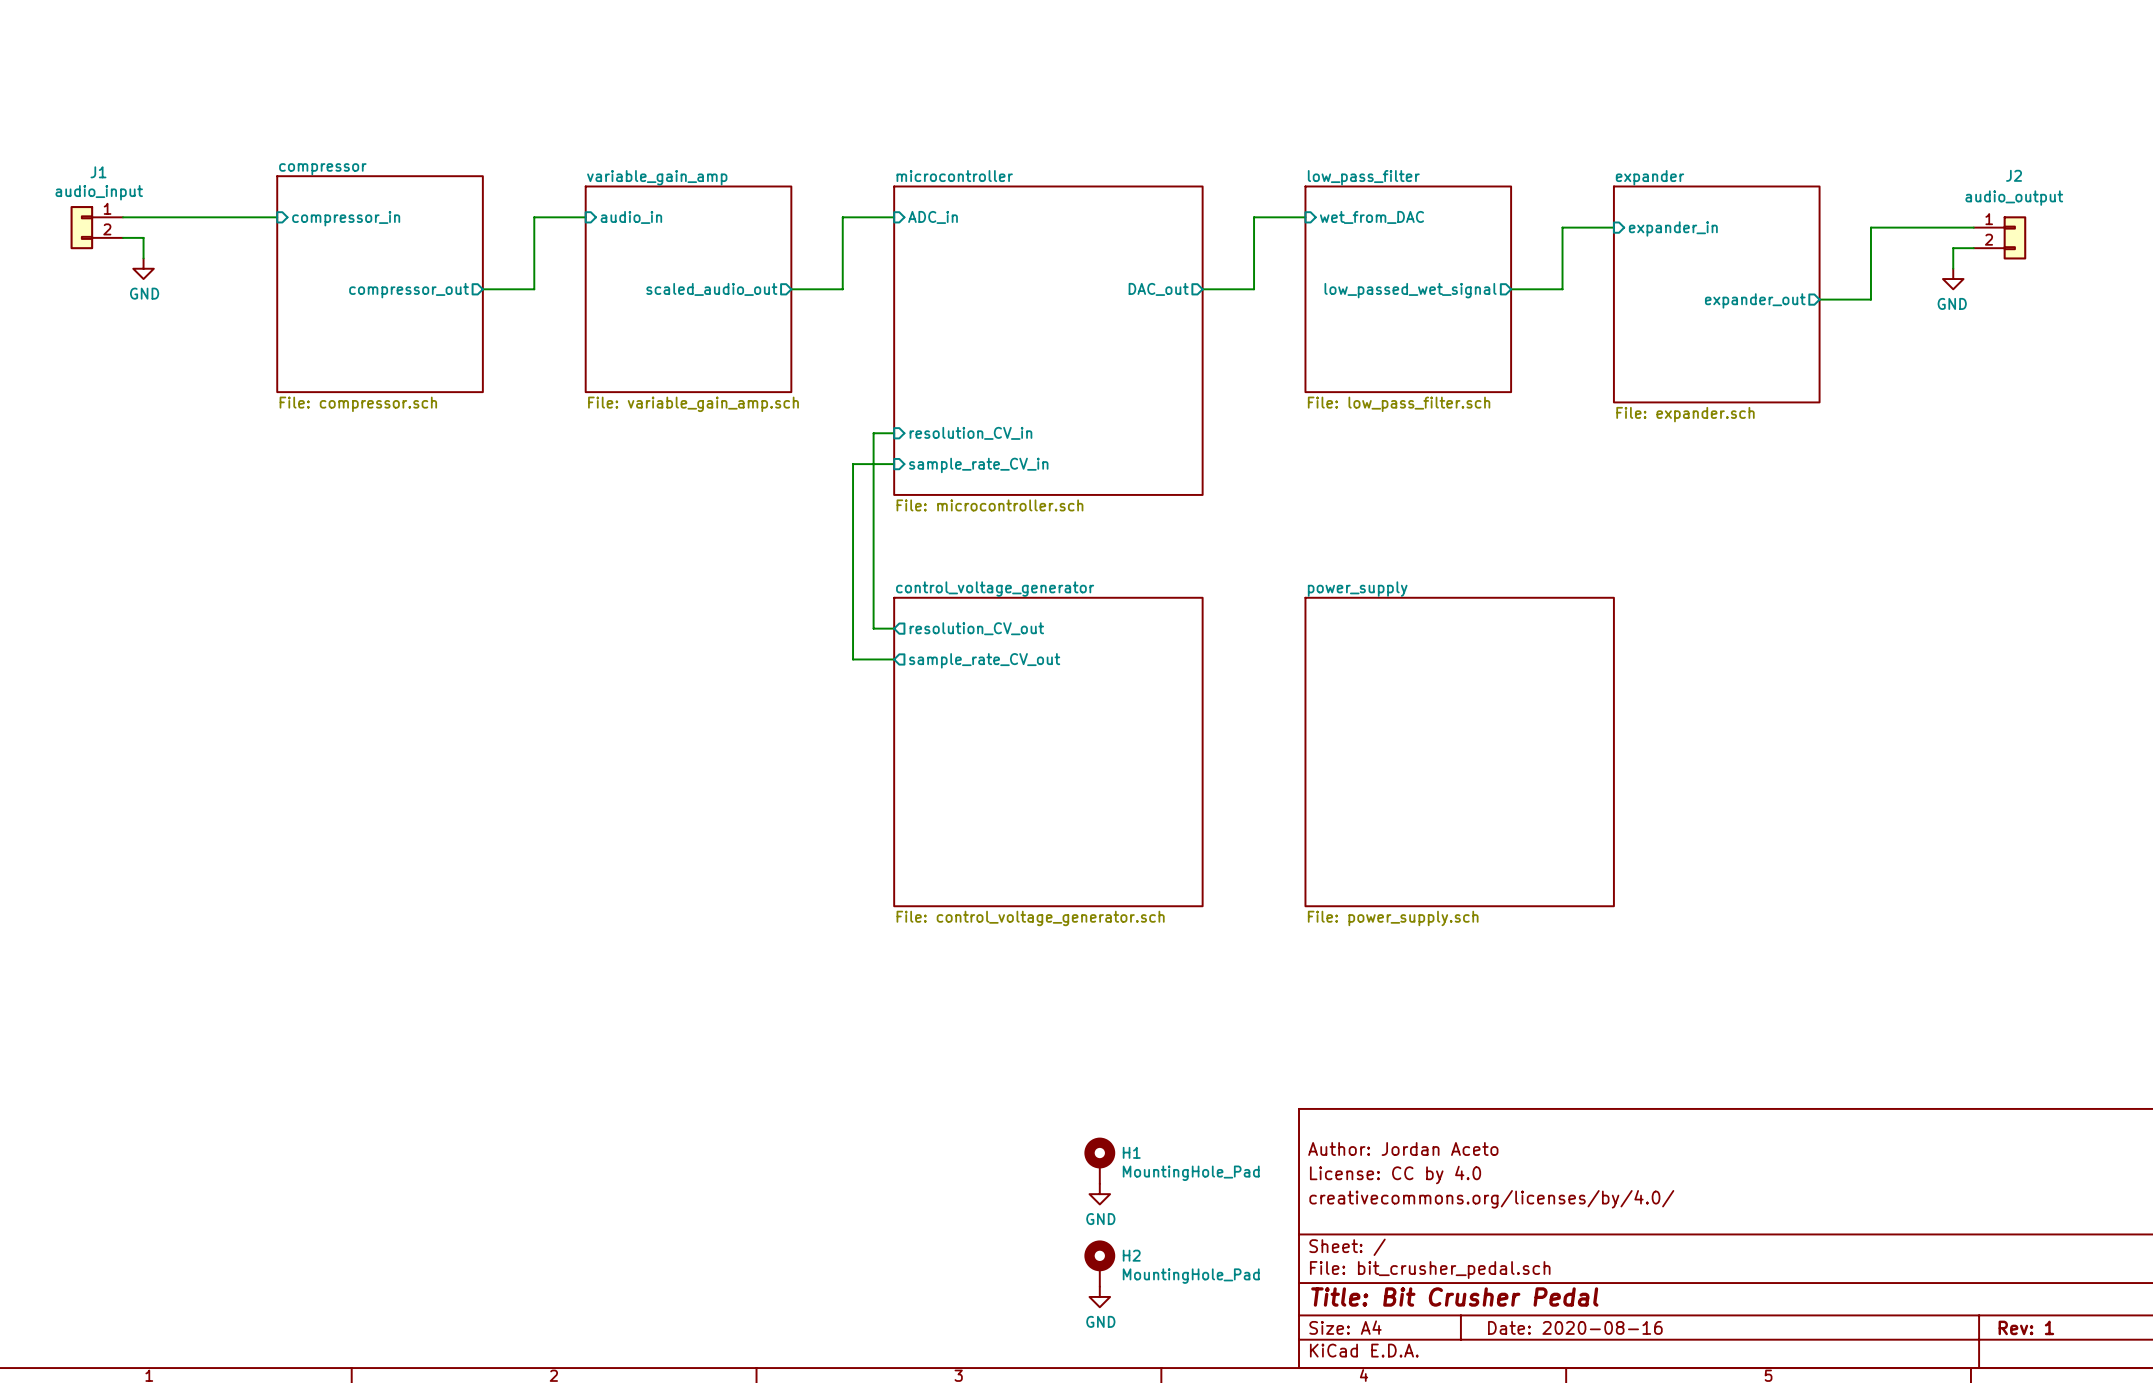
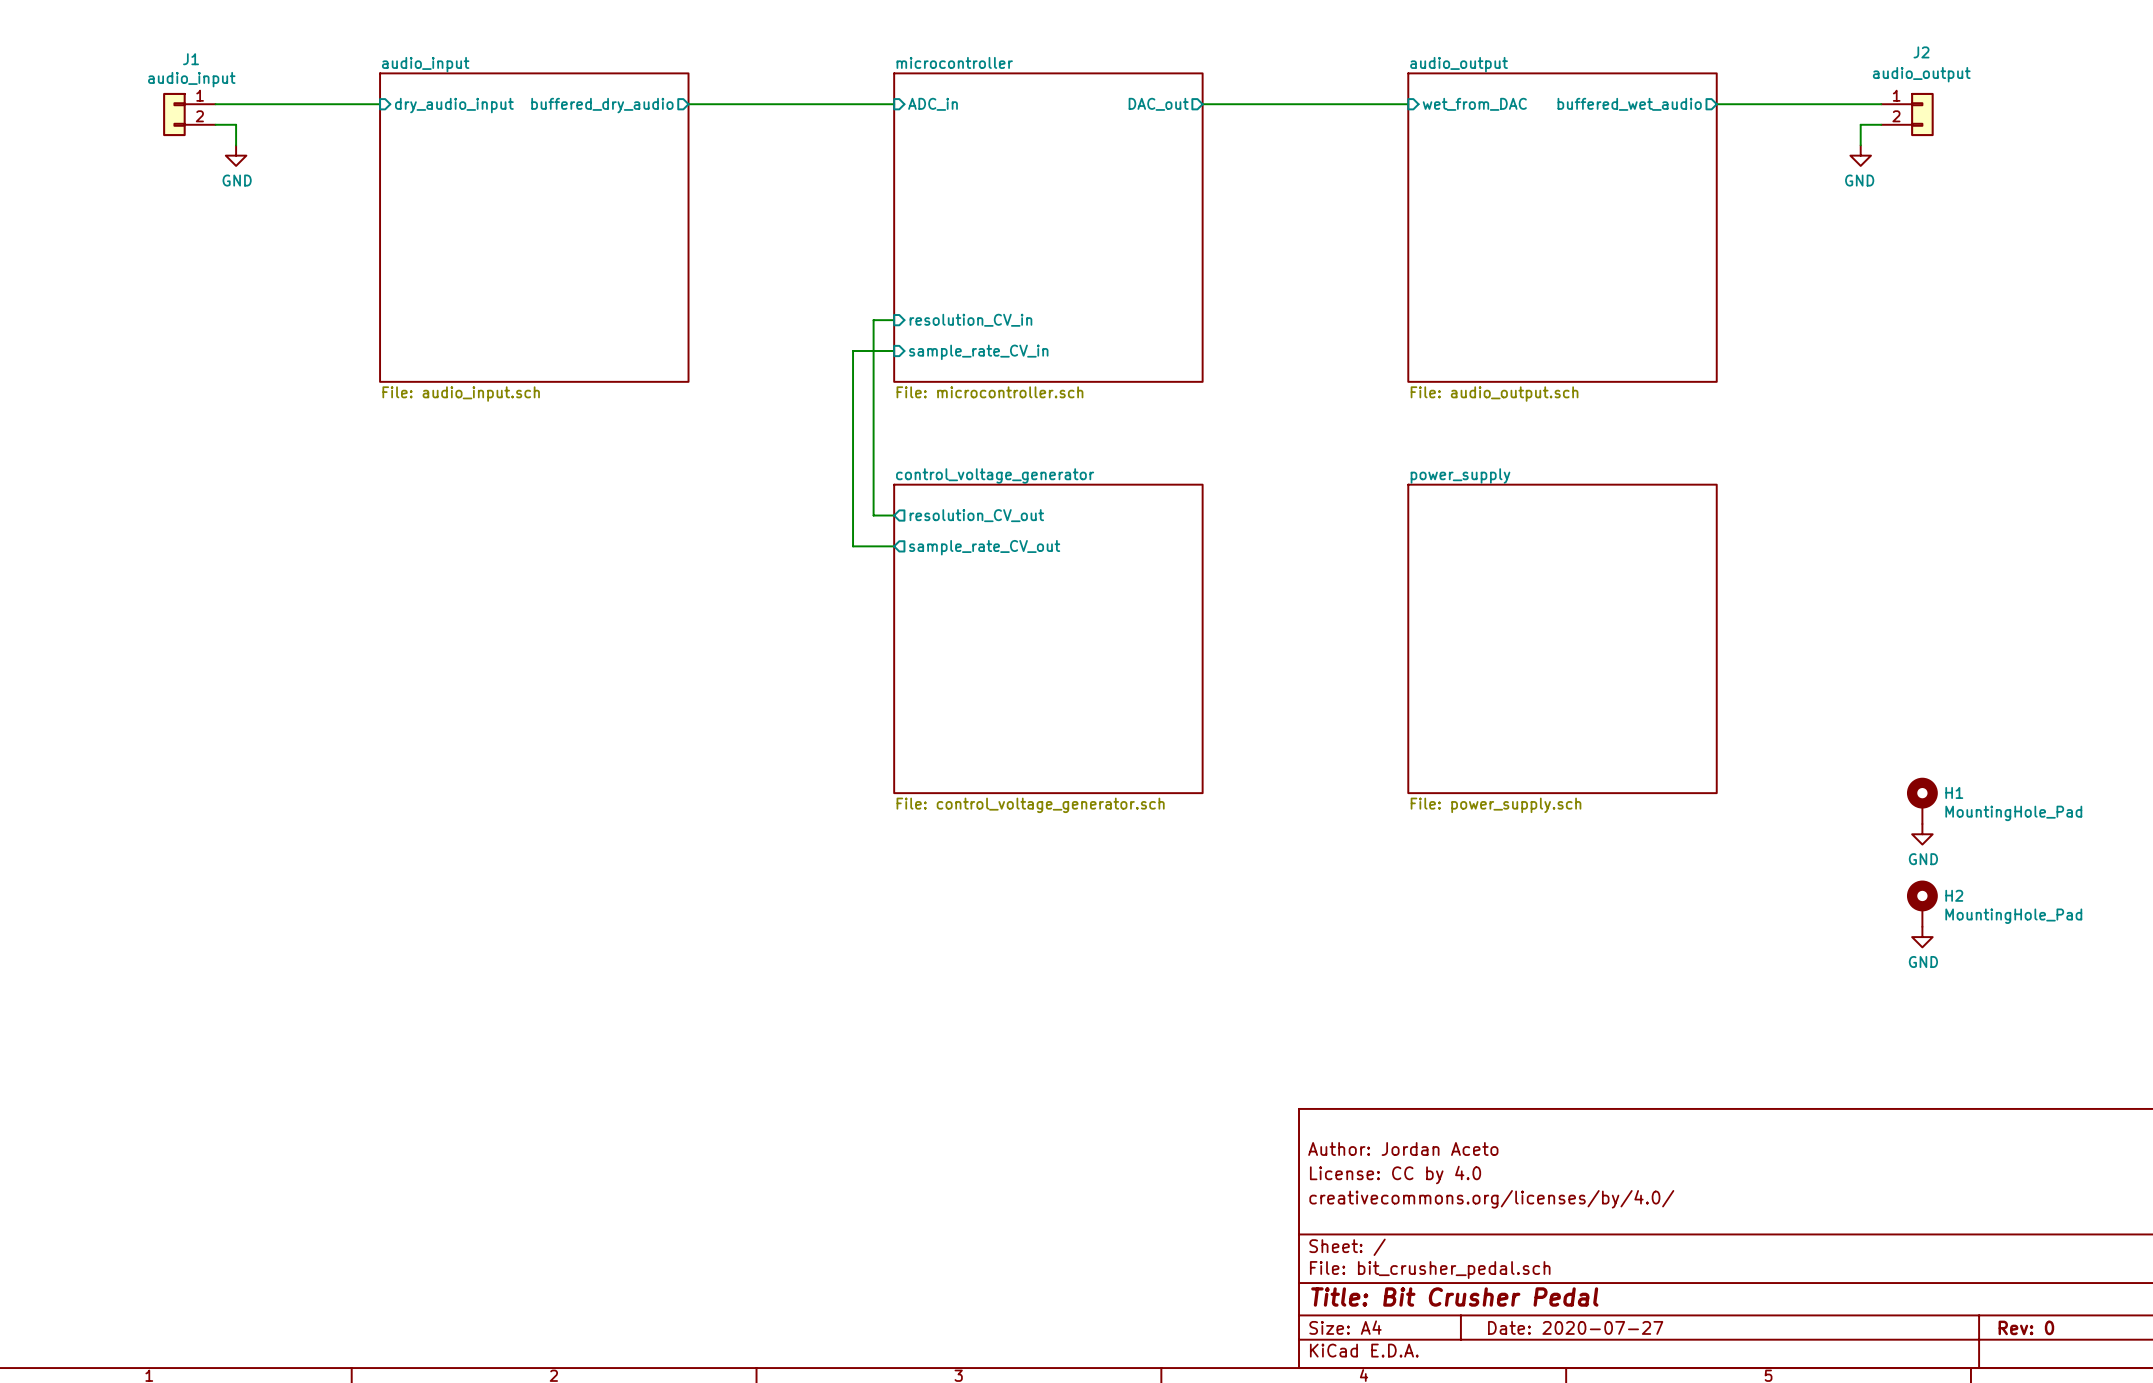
wire: none -> (215, 104) (380, 104)
wire: none -> (688, 104) (894, 104)
wire: none -> (1202, 104) (1408, 104)
sheet pin: none -> buffered_wet_audio (1629, 104)
wire: none -> (1716, 104) (1881, 104)
sheet pin: none -> dry_audio_input (454, 105)
sheet pin: none -> buffered_dry_audio (602, 105)
wire: (122, 217) (277, 217) -> none
wire: (585, 217) (534, 217) (534, 289) (482, 289) -> none
sheet pin: audio_in (631, 217) -> none
wire: (894, 217) (842, 217) (842, 289) (791, 289) -> none
sheet pin position: ADC_in (933, 217) -> ADC_in (933, 104)
wire: (1305, 217) (1254, 217) (1254, 289) (1202, 289) -> none
sheet pin position: wet_from_DAC (1371, 217) -> wet_from_DAC (1474, 104)
sheet pin: compressor_in (346, 218) -> none
J1 position: (96, 227) -> (189, 114)
sheet audio_input: none -> File: audio_input.sch (534, 227)
sheet audio_output: none -> File: audio_output.sch (1562, 227)
wire: (1613, 227) (1562, 227) (1562, 289) (1511, 289) -> none
wire: (1973, 227) (1870, 227) (1870, 299) (1819, 299) -> none
sheet pin: expander_in (1673, 228) -> none
wire: (122, 237) (143, 237) (143, 258) -> (215, 124) (236, 124) (236, 145)
J2 position: (2000, 237) -> (1907, 114)
wire: (1973, 248) (1953, 248) (1953, 268) -> (1881, 124) (1860, 124) (1860, 145)
power symbol position: GND (143, 268) -> GND (236, 155)
power symbol position: GND (1953, 279) -> GND (1860, 155)
sheet compressor: File: compressor.sch (380, 284) -> none
sheet variable_gain_amp: File: variable_gain_amp.sch (688, 289) -> none
sheet pin: scaled_audio_out (711, 289) -> none
sheet pin position: DAC_out (1158, 289) -> DAC_out (1158, 104)
sheet low_pass_filter: File: low_pass_filter.sch (1408, 289) -> none
sheet pin: compressor_out (409, 290) -> none
sheet pin: low_passed_wet_signal (1410, 290) -> none
sheet expander: File: expander.sch (1716, 294) -> none
sheet pin: expander_out (1755, 300) -> none
sheet microcontroller position: (1048, 340) -> (1048, 227)
wire: (873, 433) (894, 433) -> (873, 433) (873, 320) (894, 320)
sheet pin position: resolution_CV_in (970, 433) -> resolution_CV_in (970, 320)
wire: (853, 464) (894, 464) -> (853, 464) (853, 351) (894, 351)
sheet pin position: sample_rate_CV_in (978, 465) -> sample_rate_CV_in (978, 352)
wire: (873, 515) (873, 628) (894, 628) -> (873, 515) (894, 515)
wire: (853, 546) (853, 659) (894, 659) -> (853, 546) (894, 546)
sheet pin position: resolution_CV_out (976, 628) -> resolution_CV_out (976, 515)
sheet pin position: sample_rate_CV_out (984, 660) -> sample_rate_CV_out (984, 547)
sheet control_voltage_generator position: (1048, 752) -> (1048, 638)
sheet power_supply position: (1459, 752) -> (1562, 638)
power symbol: none -> GND (1922, 834)
power symbol: none -> GND (1922, 937)
H1 position: (1099, 1160) -> (1922, 800)
power symbol: GND (1099, 1194) -> none
H2 position: (1099, 1263) -> (1922, 903)
power symbol: GND (1099, 1296) -> none
title block: Date: 2020-08-16 (1575, 1327) -> Date: 2020-07-27 (1575, 1327)
title block: Rev: 1 (2026, 1327) -> Rev: 0 (2026, 1327)

